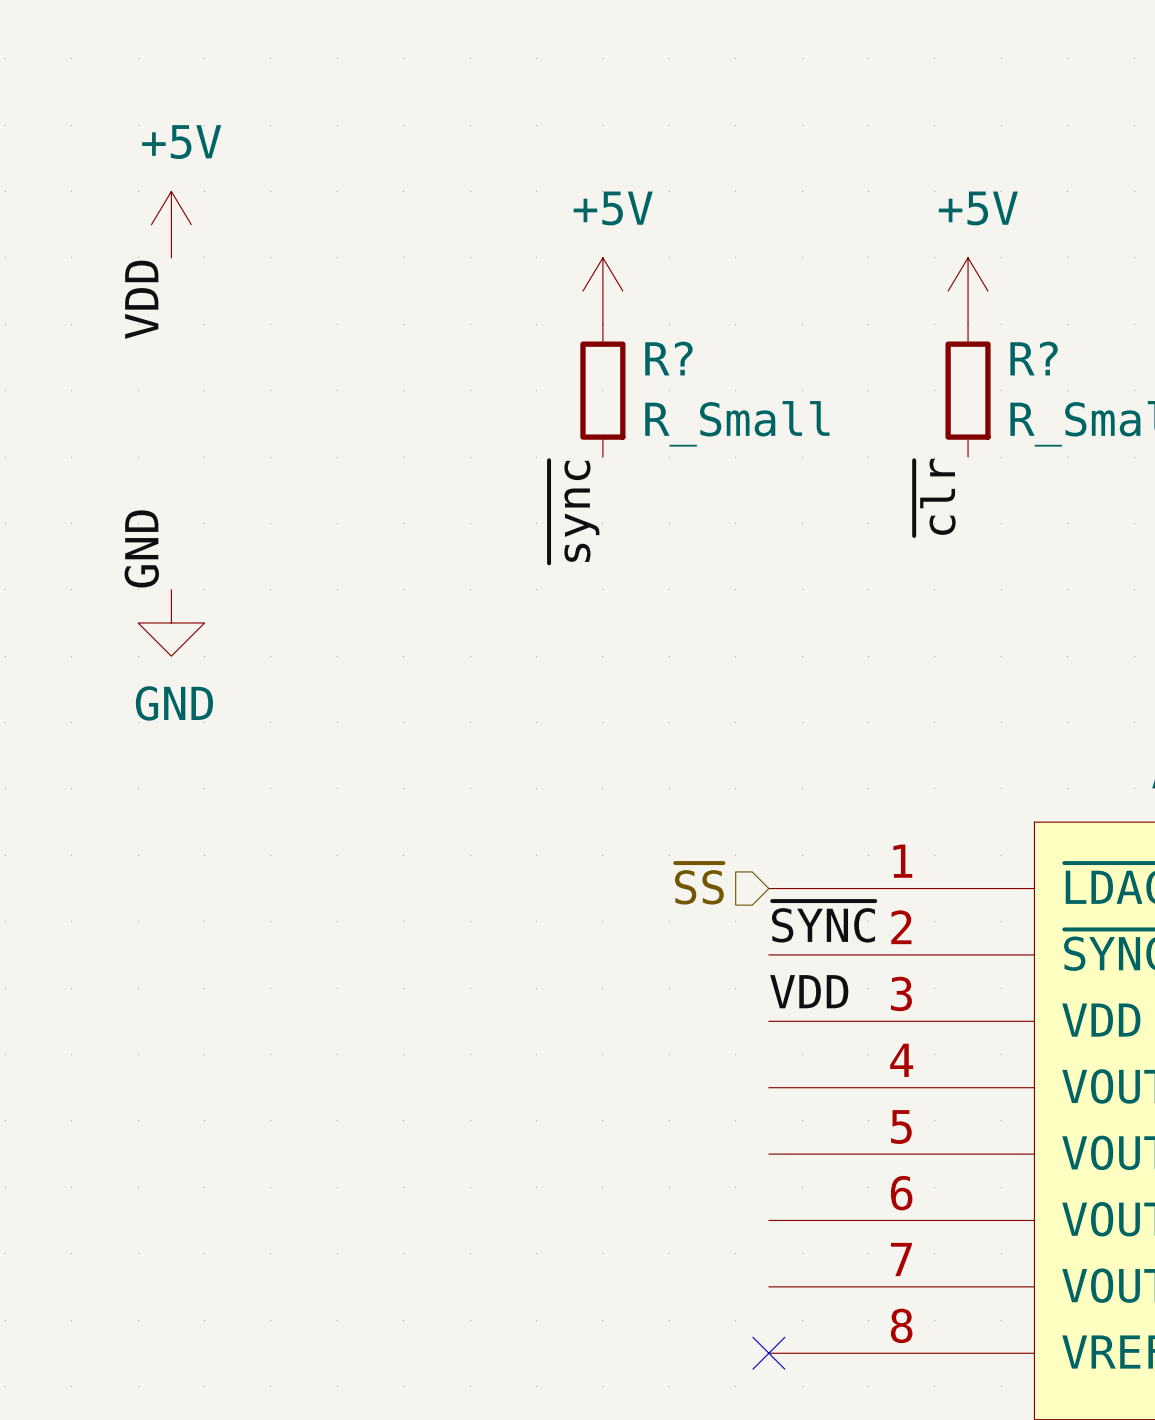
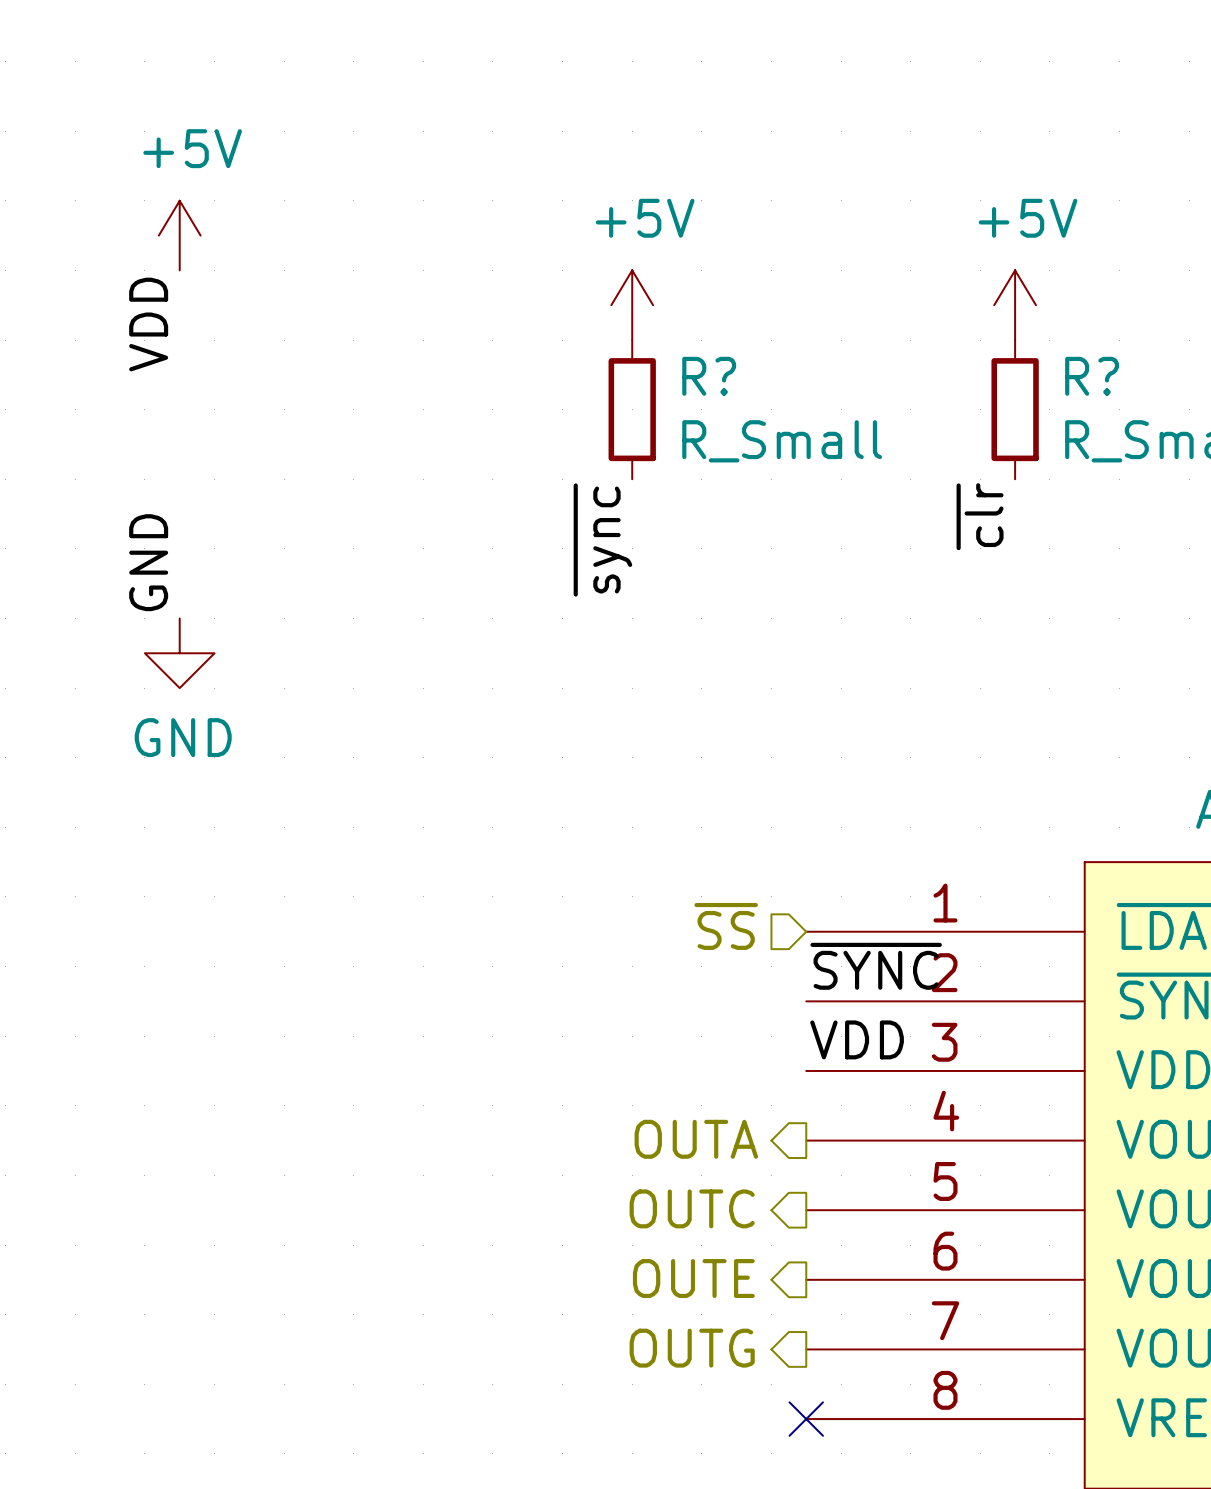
hierarchical label: none -> OUTA (696, 1139)
hierarchical label: none -> OUTC (692, 1208)
hierarchical label: none -> OUTE (693, 1278)
hierarchical label: none -> OUTG (692, 1348)

